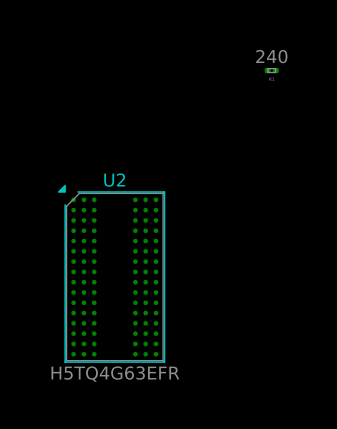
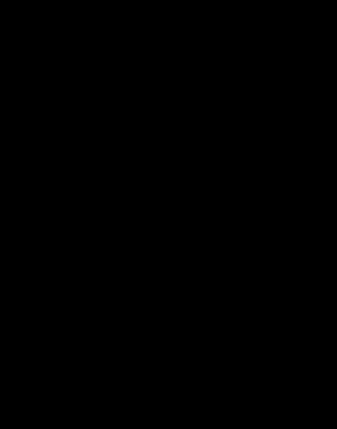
part: 240 (271, 70) -> none
U2: H5TQ4G63EFR (111, 273) -> none

